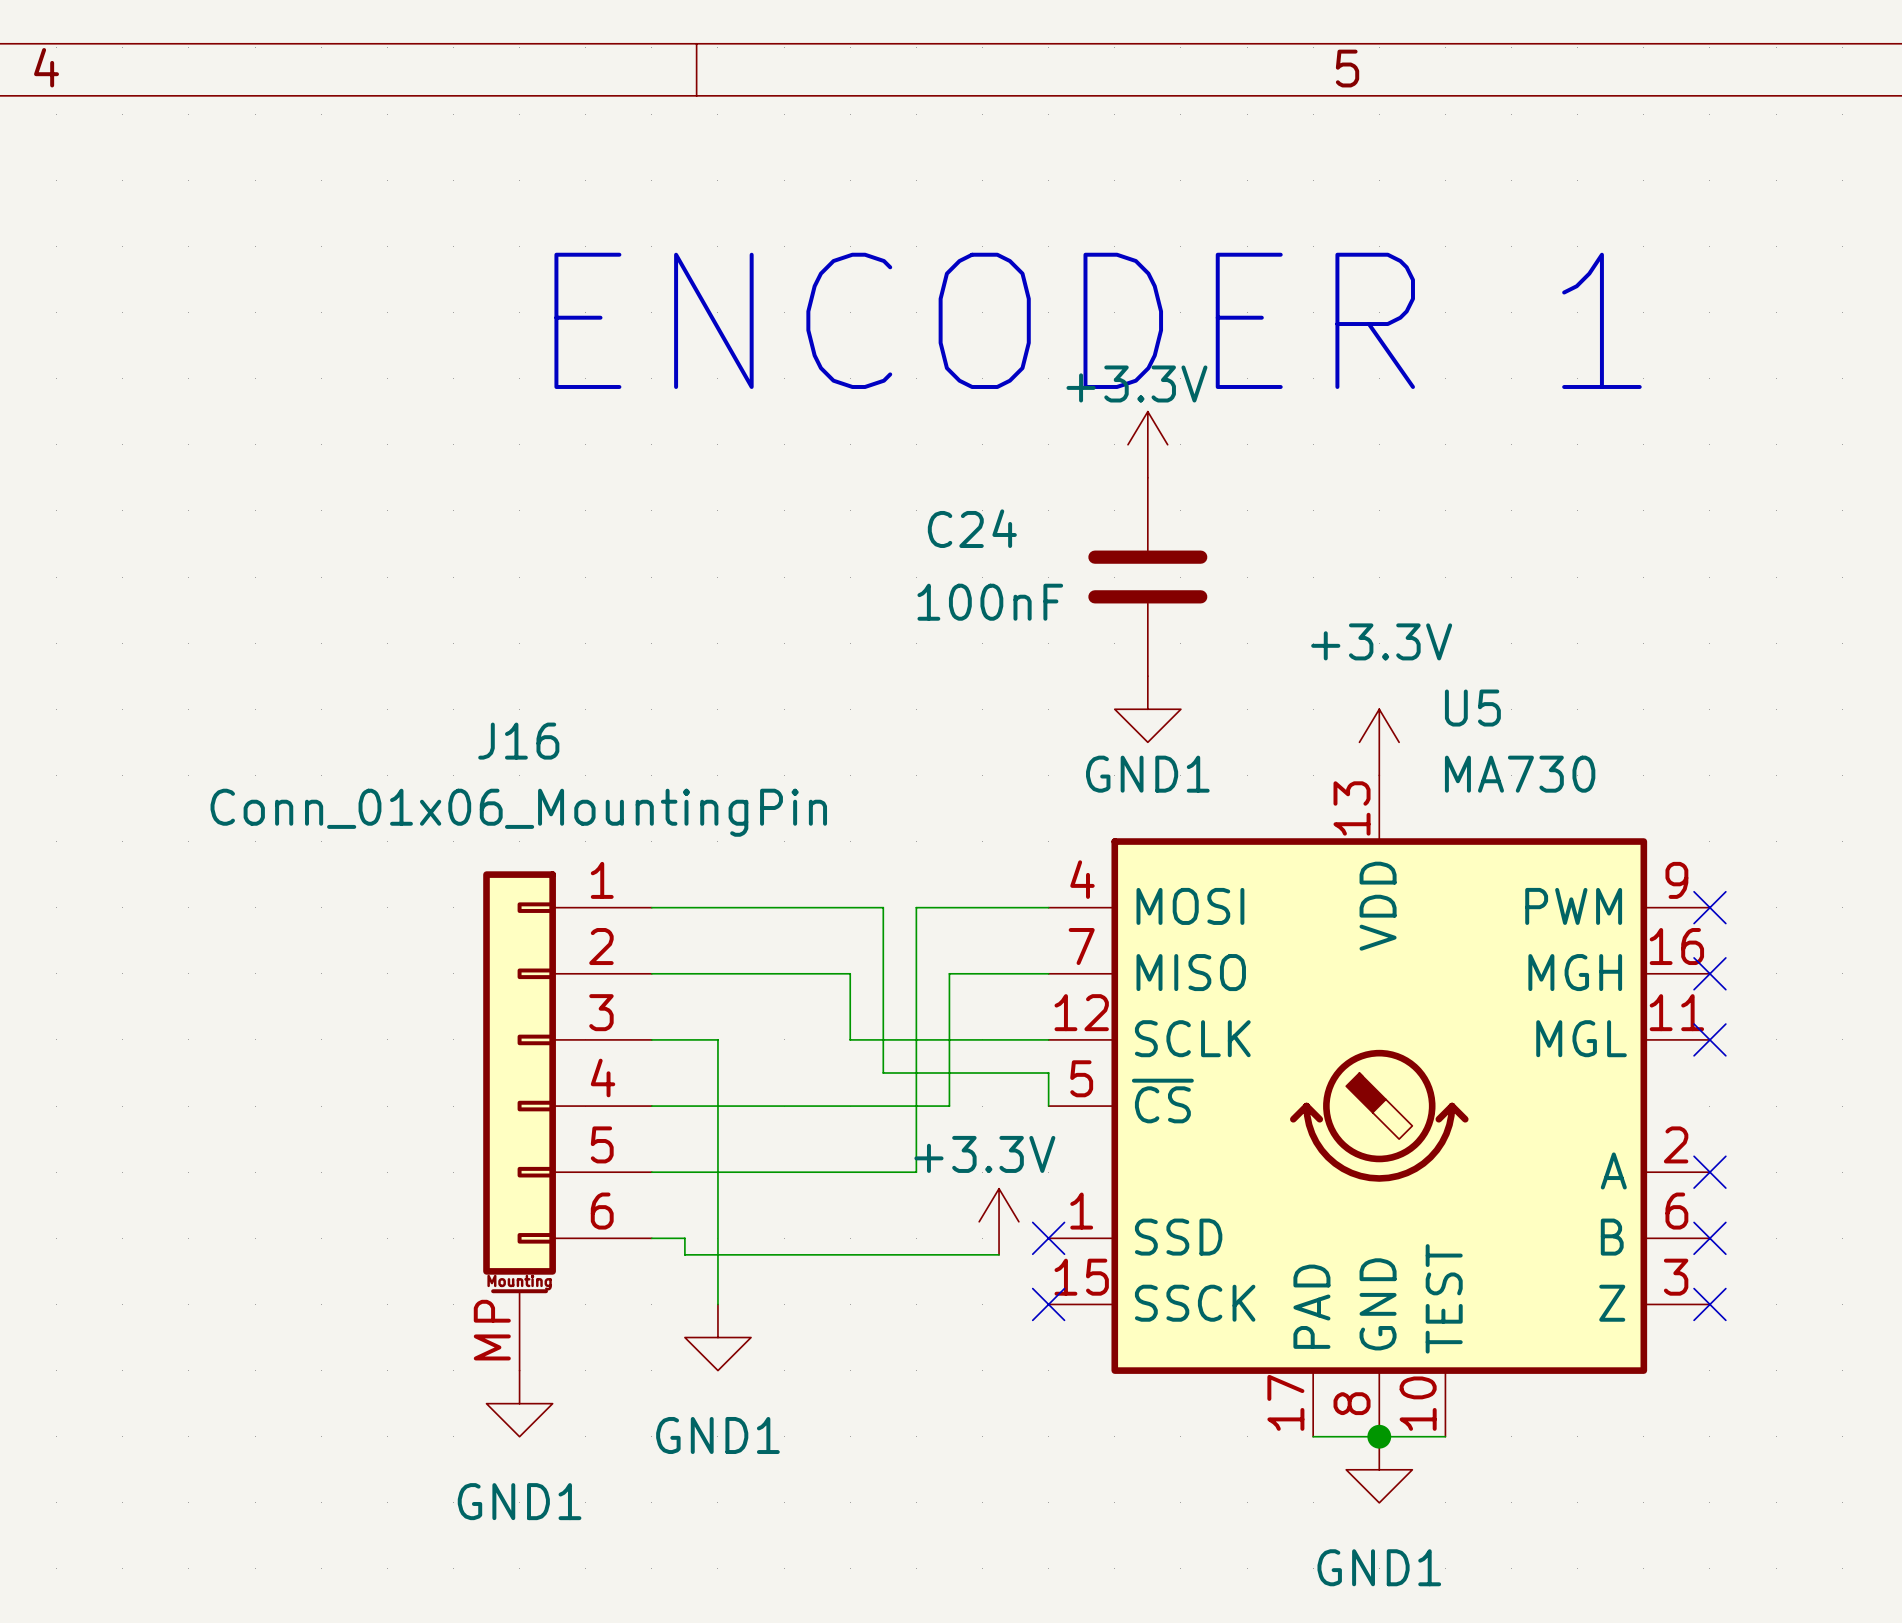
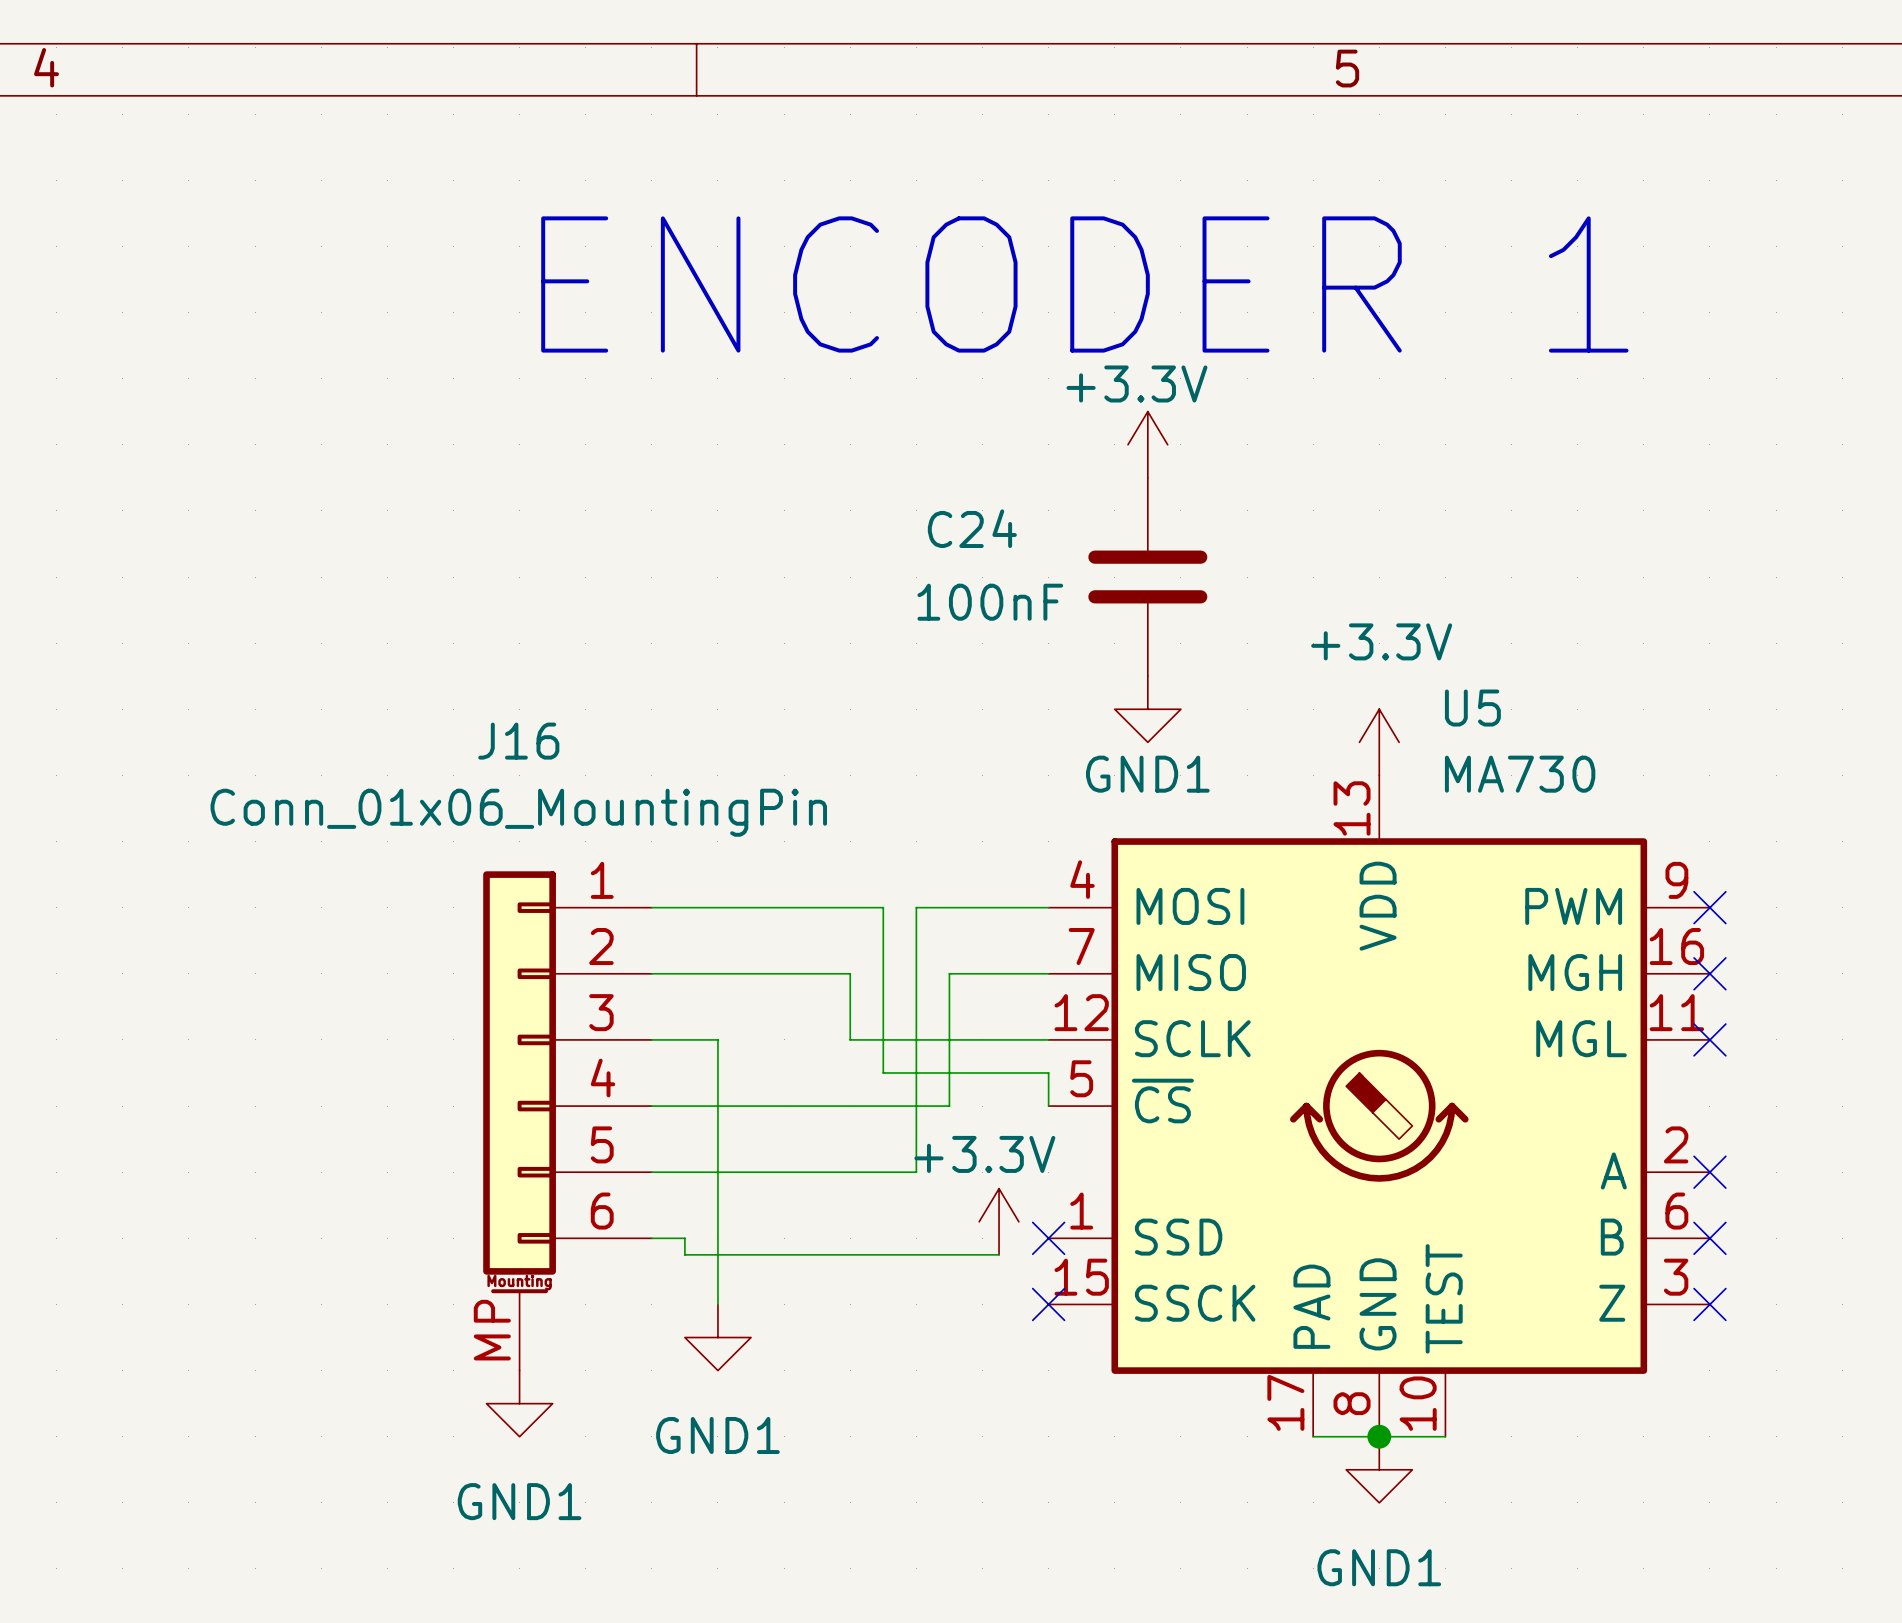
text position: ENCODER 1 (1098, 320) -> ENCODER 1 (1084, 284)

